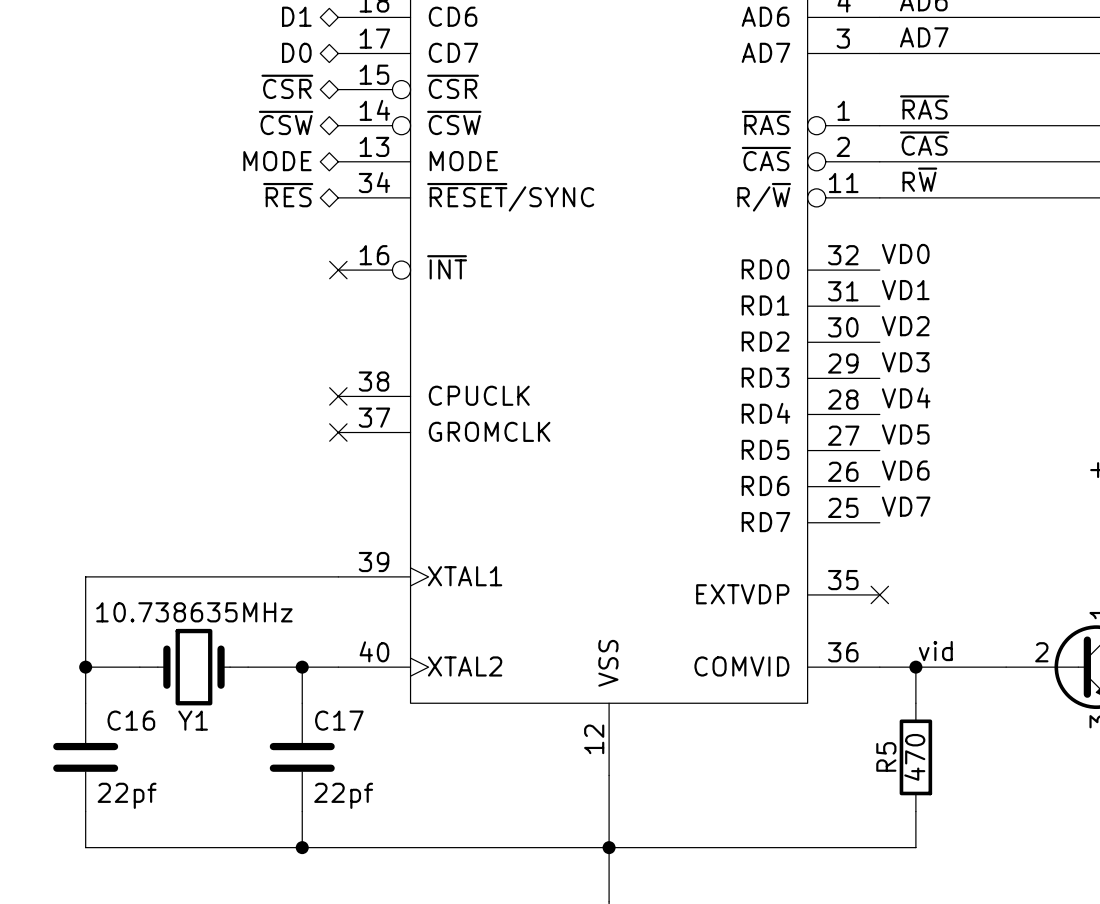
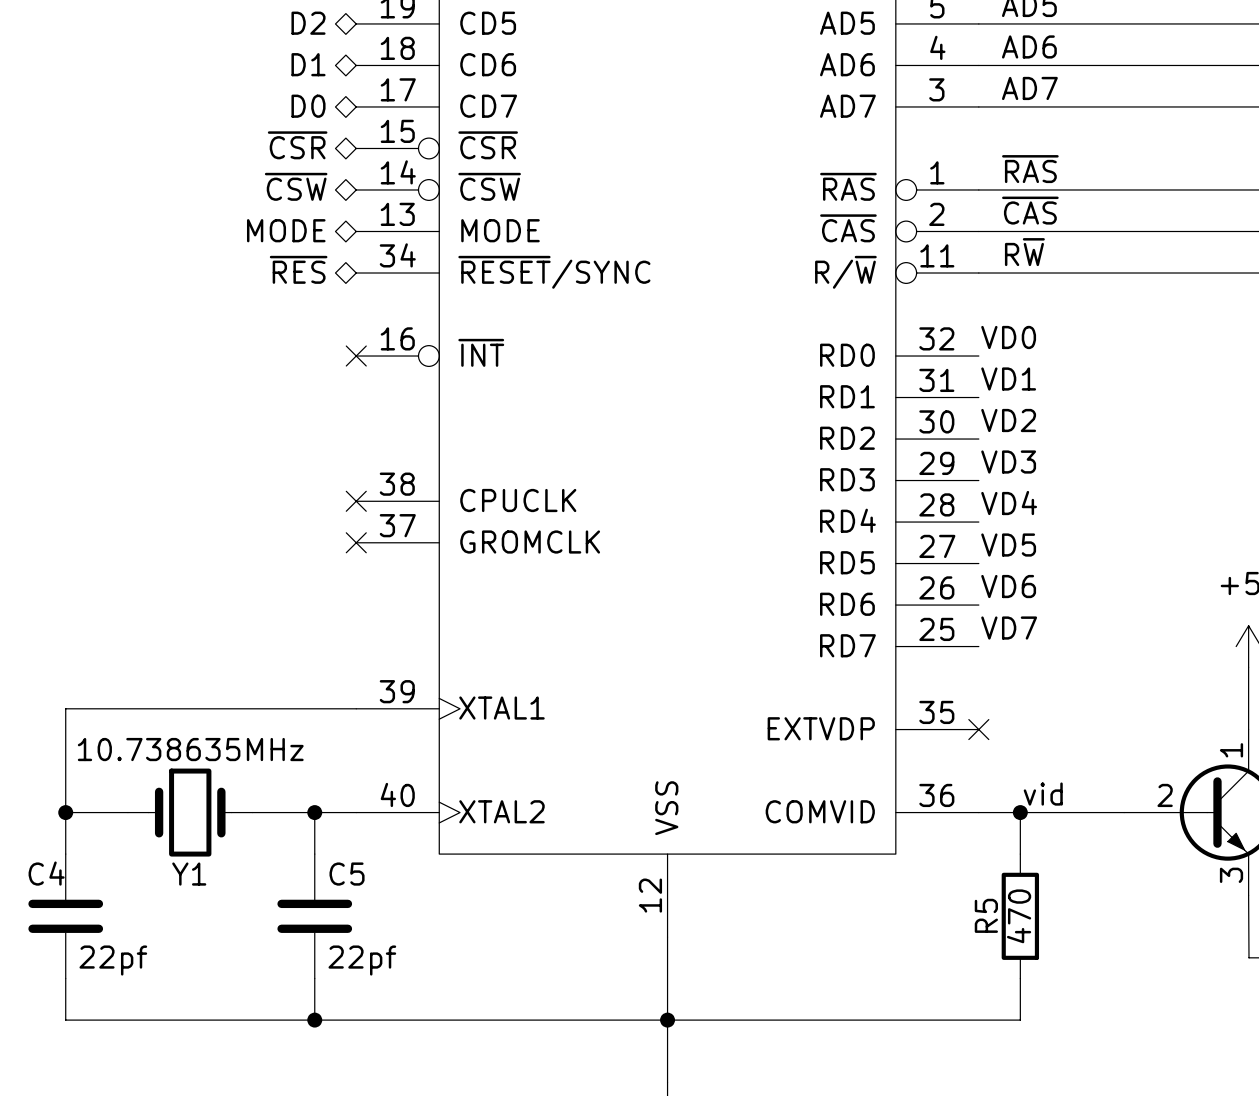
C16 name: C16 (131, 720) -> C4 (46, 873)
C17 name: C17 (339, 720) -> C5 (347, 874)

